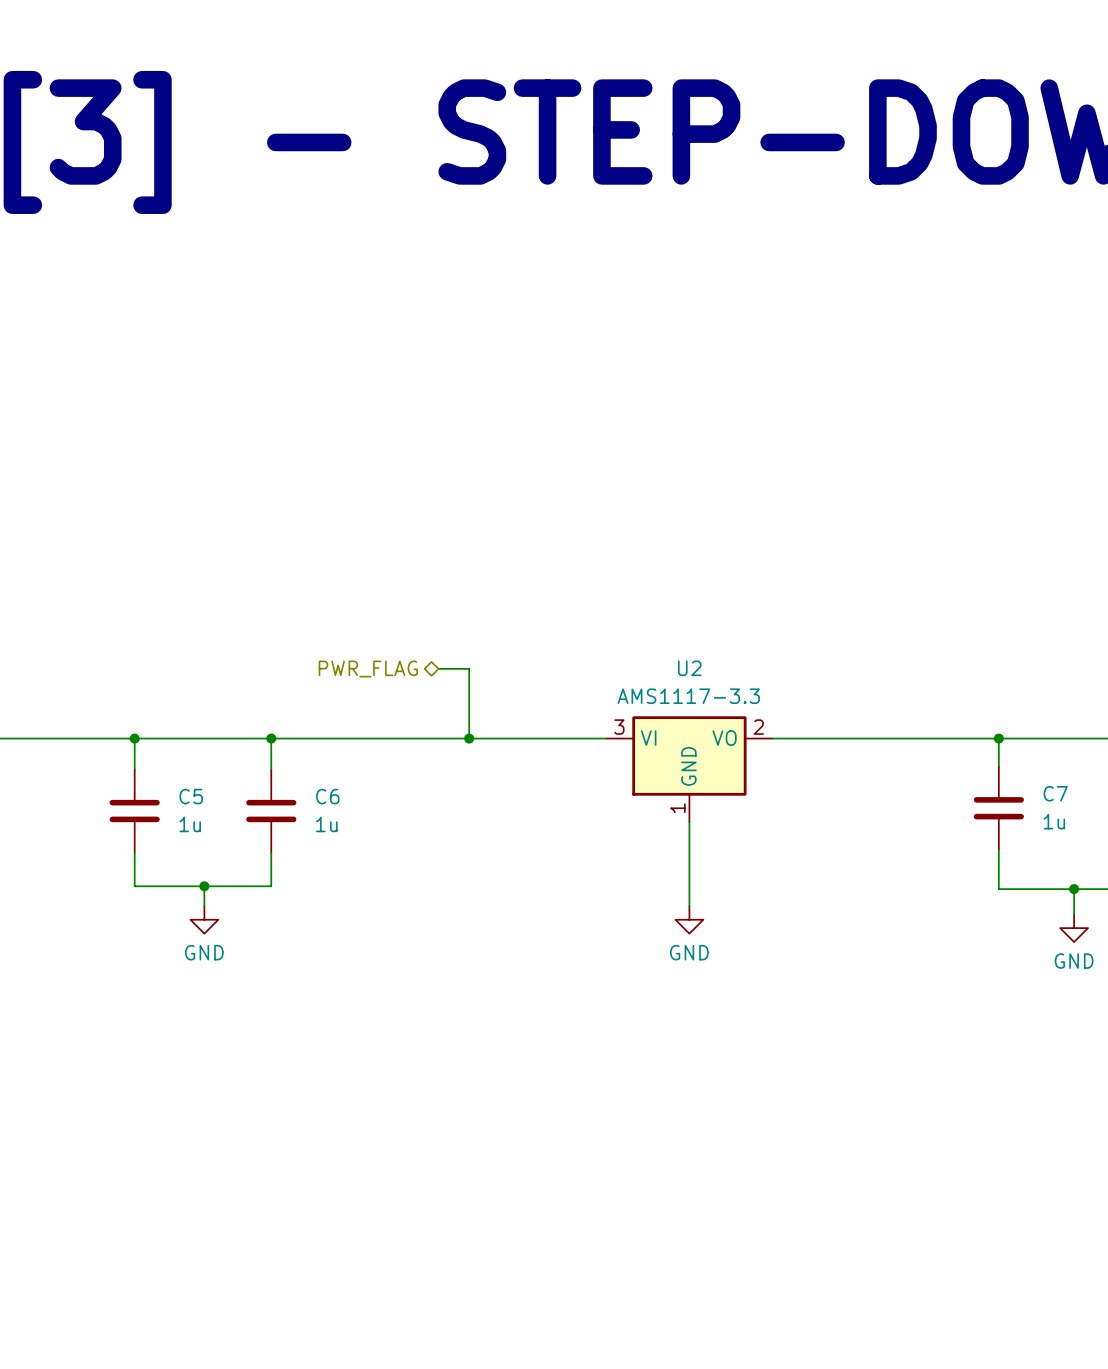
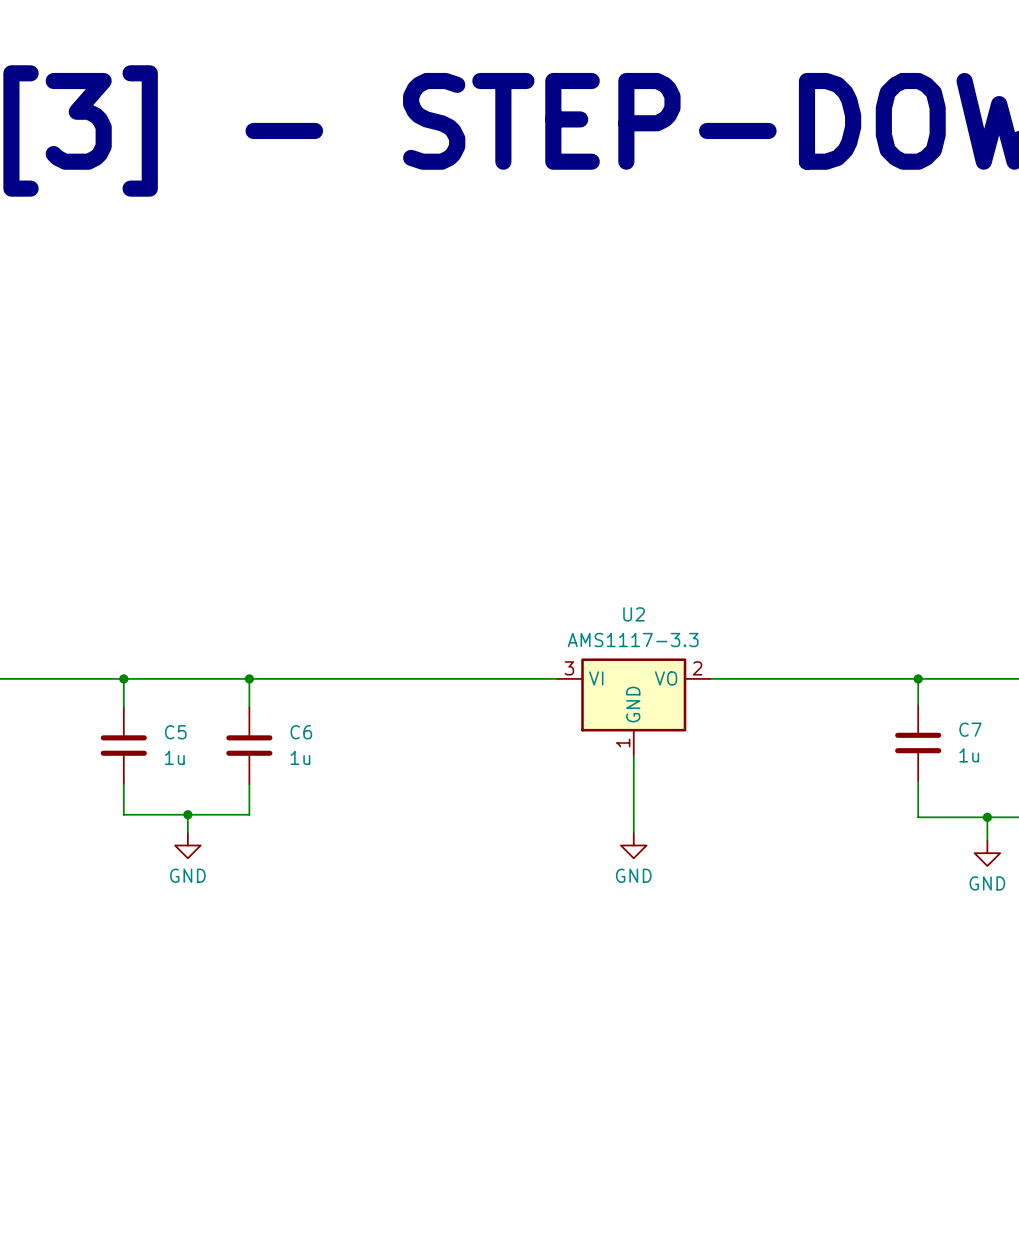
wire: (438, 668) (469, 668) (469, 738) -> none
hierarchical label: PWR_FLAG (368, 669) -> none
junction: (469, 738) -> none

